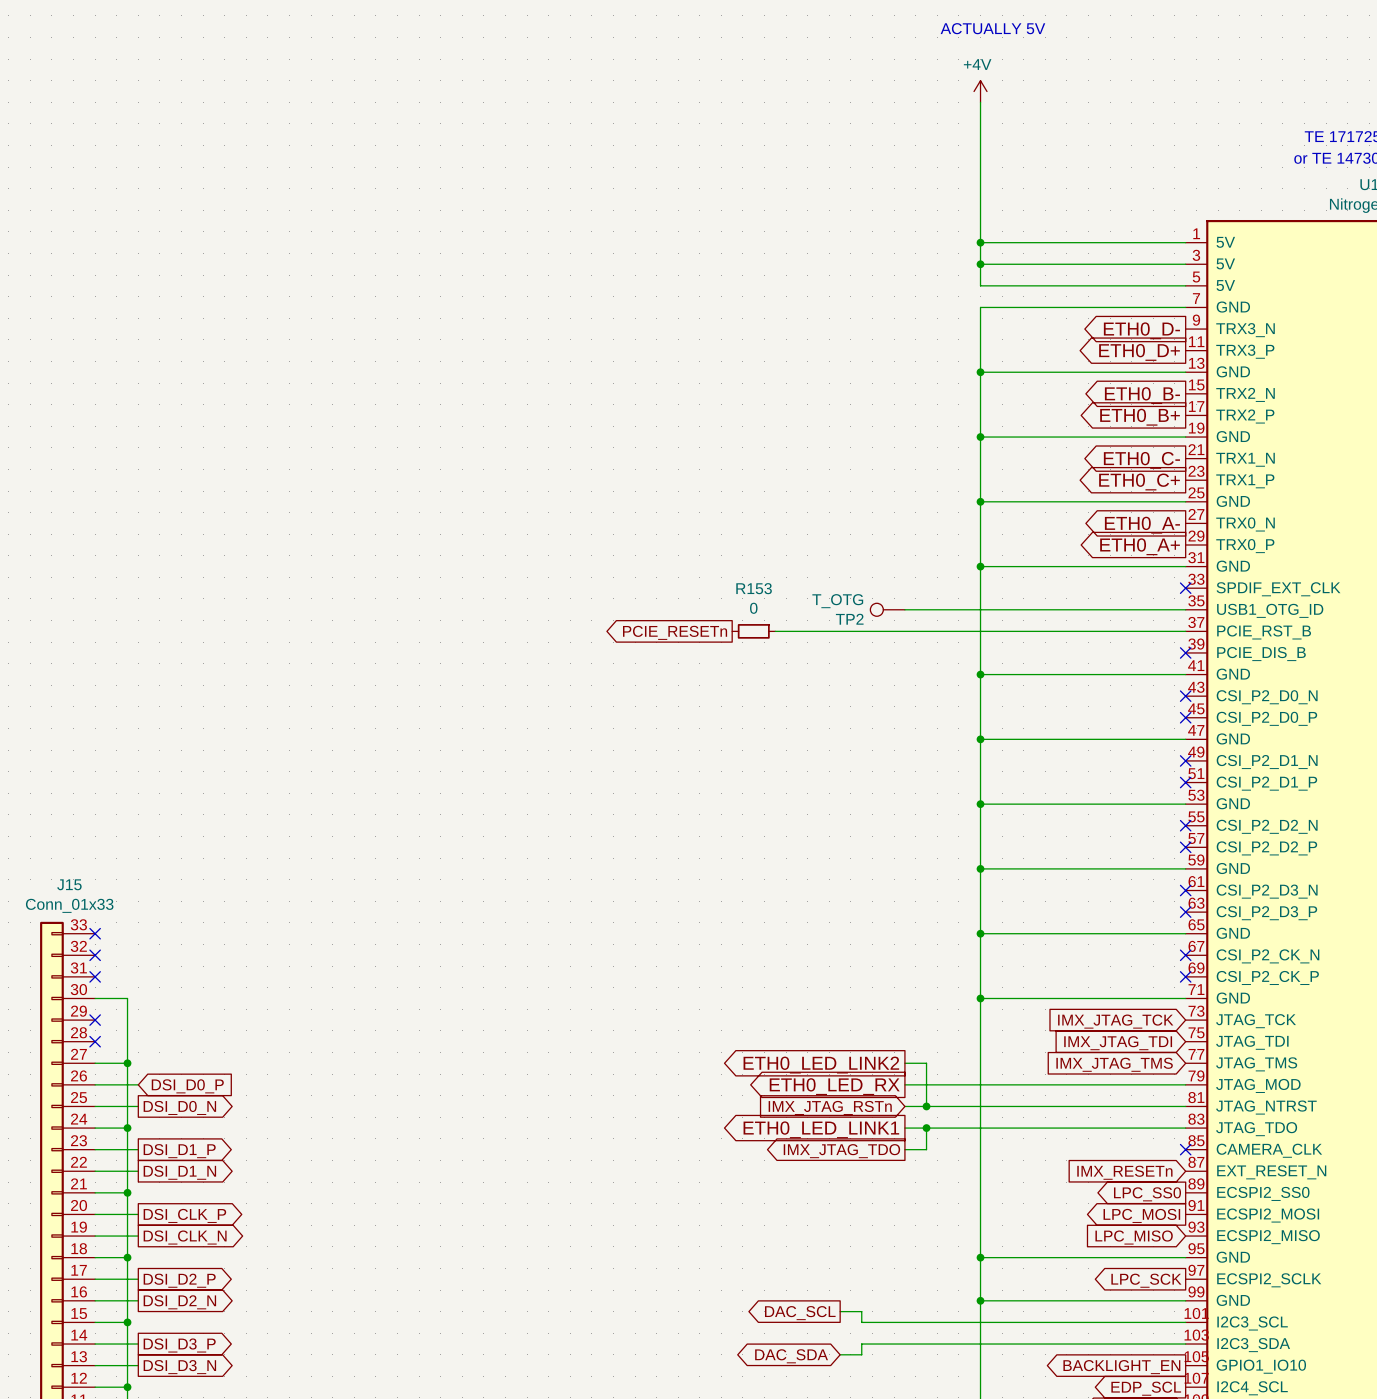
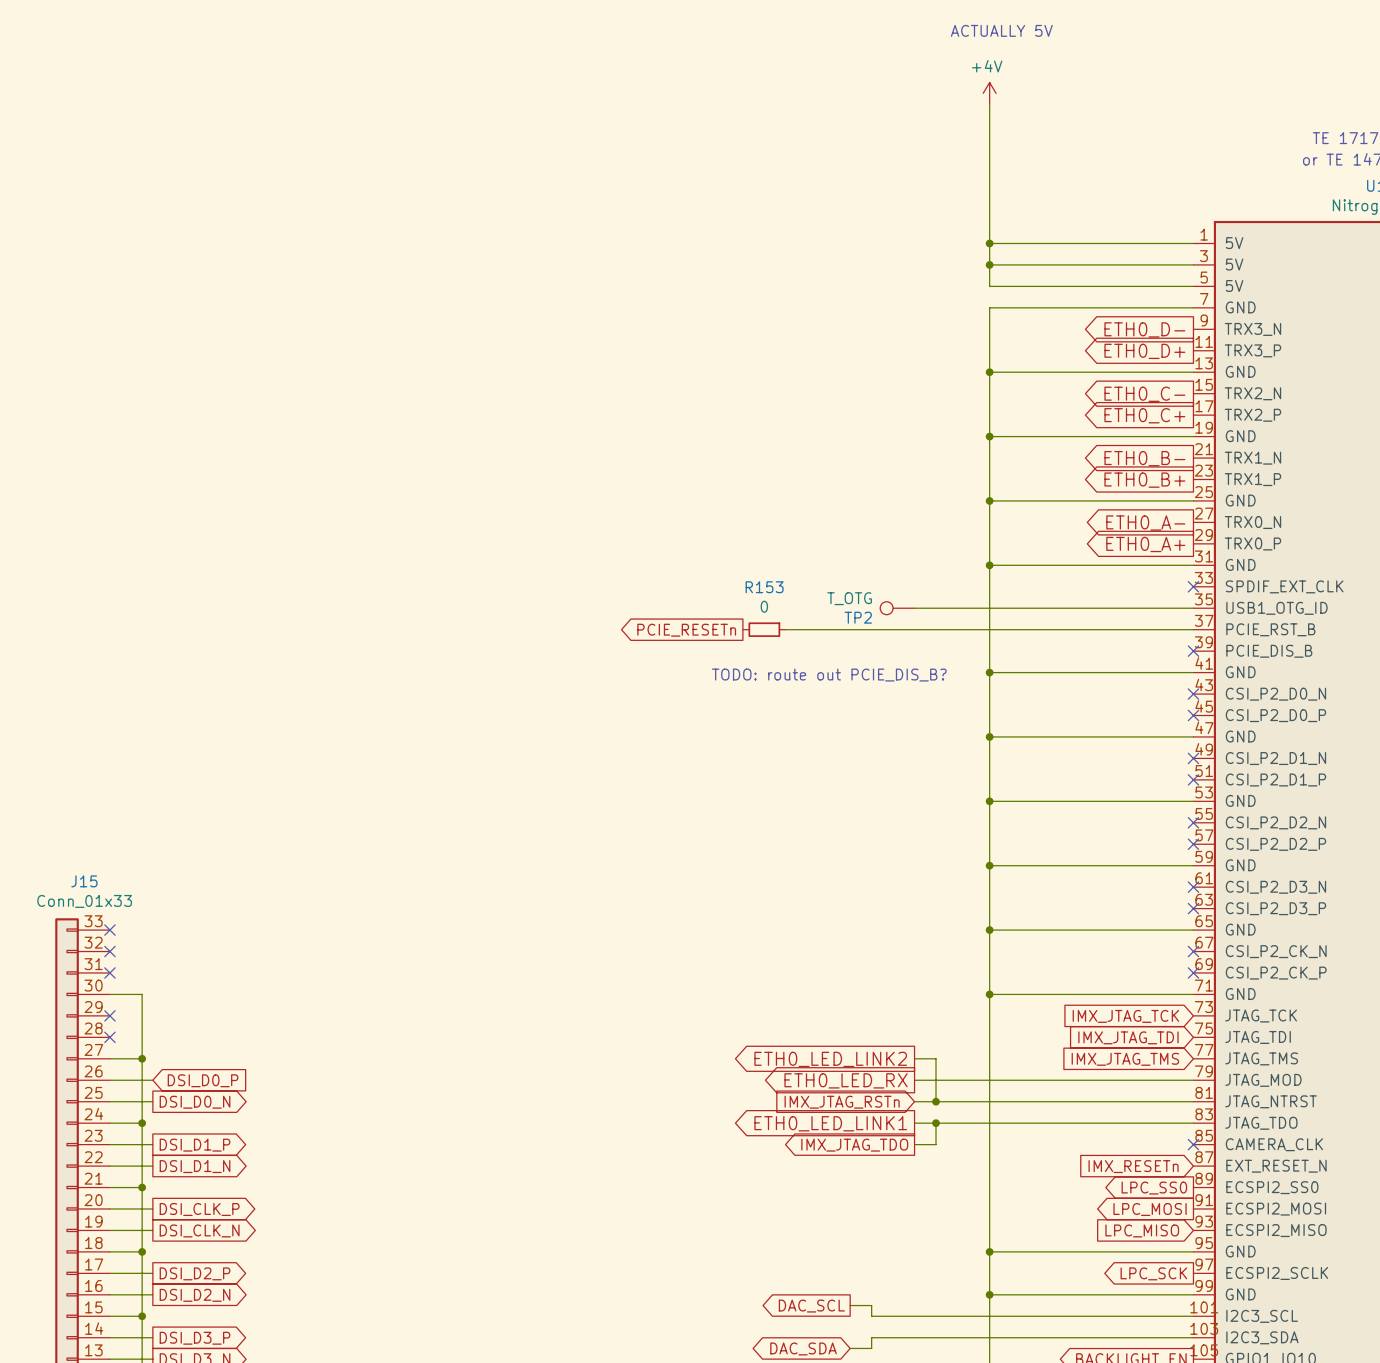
global label: ETH0_B- (1142, 395) -> ETH0_C- (1144, 394)
global label: ETH0_B+ (1140, 417) -> ETH0_C+ (1144, 415)
global label: ETH0_C- (1141, 460) -> ETH0_B- (1144, 458)
global label: ETH0_C+ (1139, 481) -> ETH0_B+ (1144, 480)
text: none -> TODO: route out PCIE_DIS_B? (829, 675)

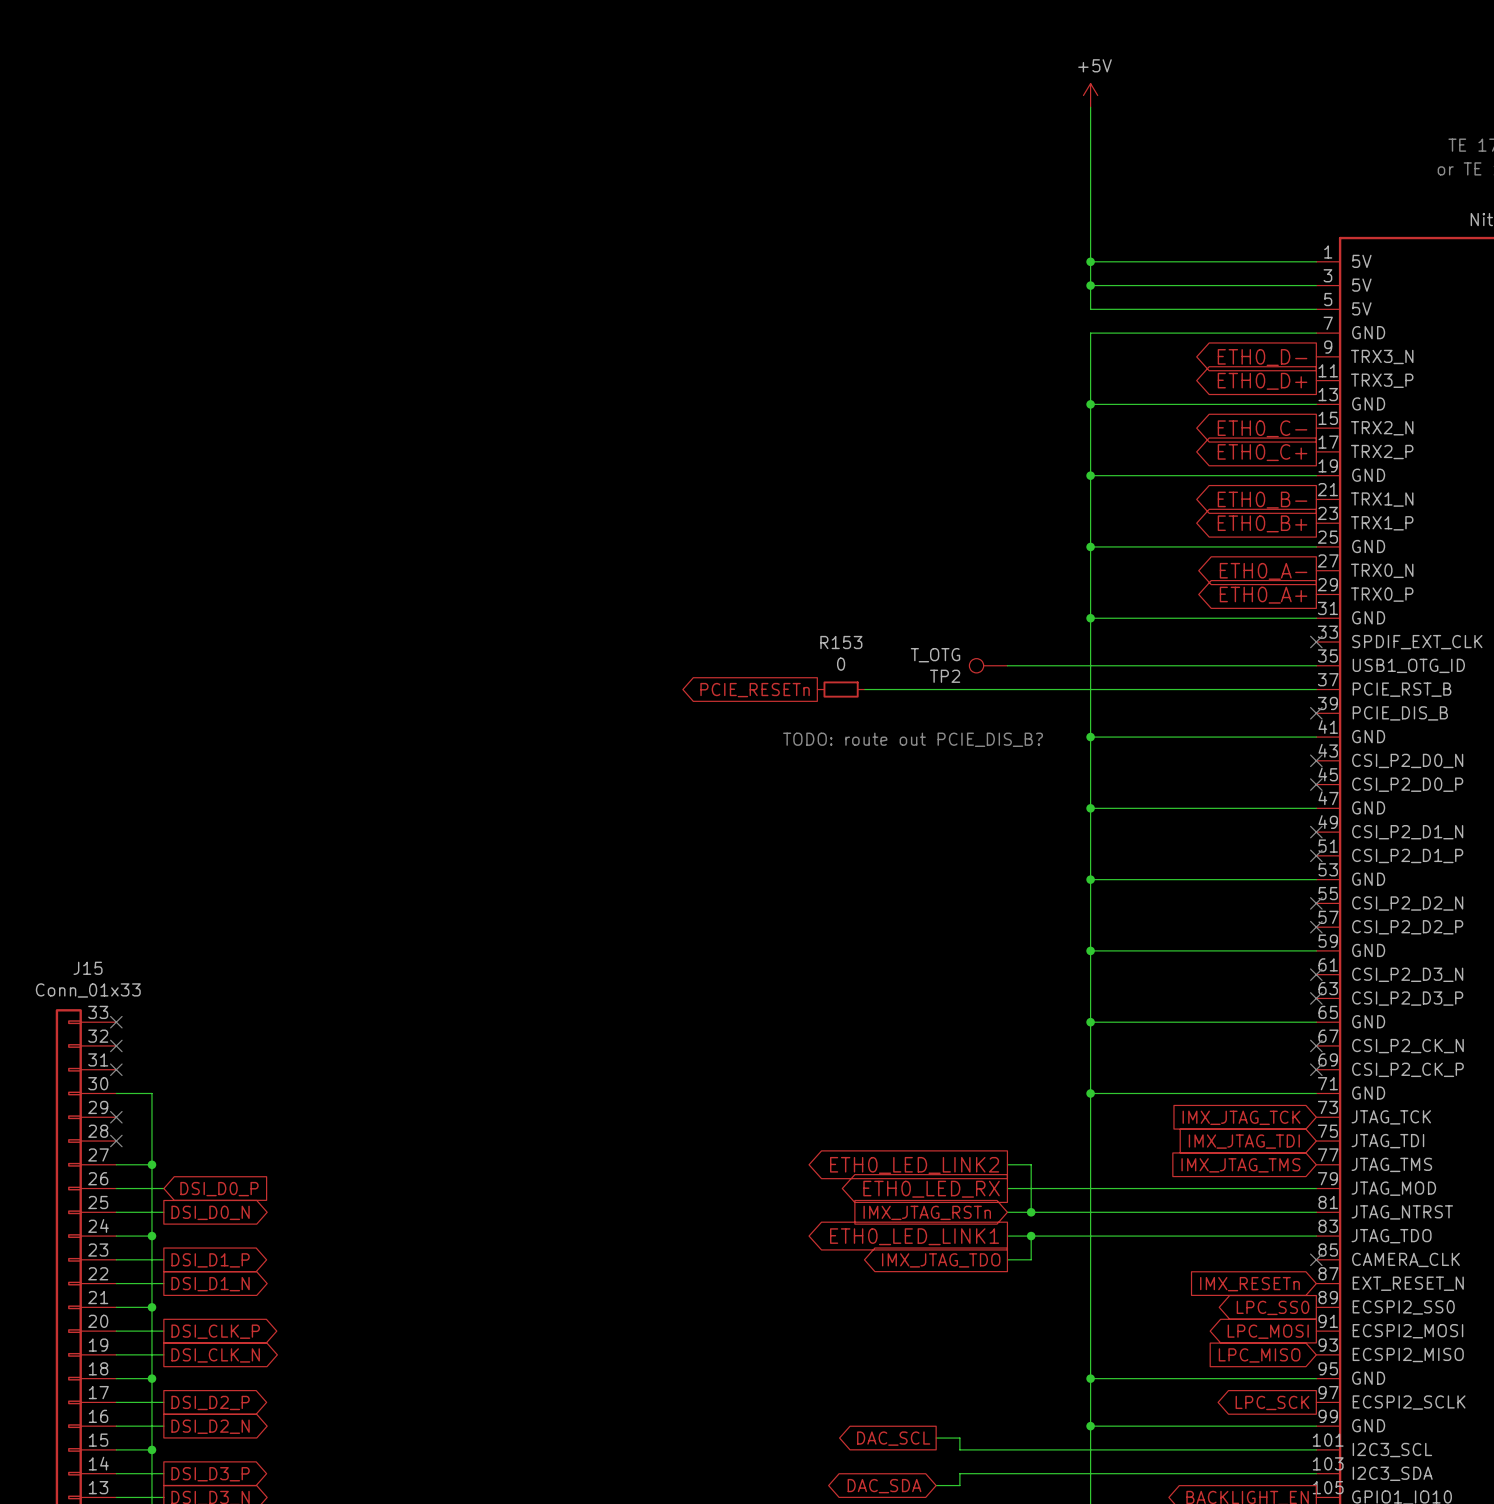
text: ACTUALLY 5V (1001, 30) -> none
power symbol: +4V (989, 93) -> +5V (1090, 95)

